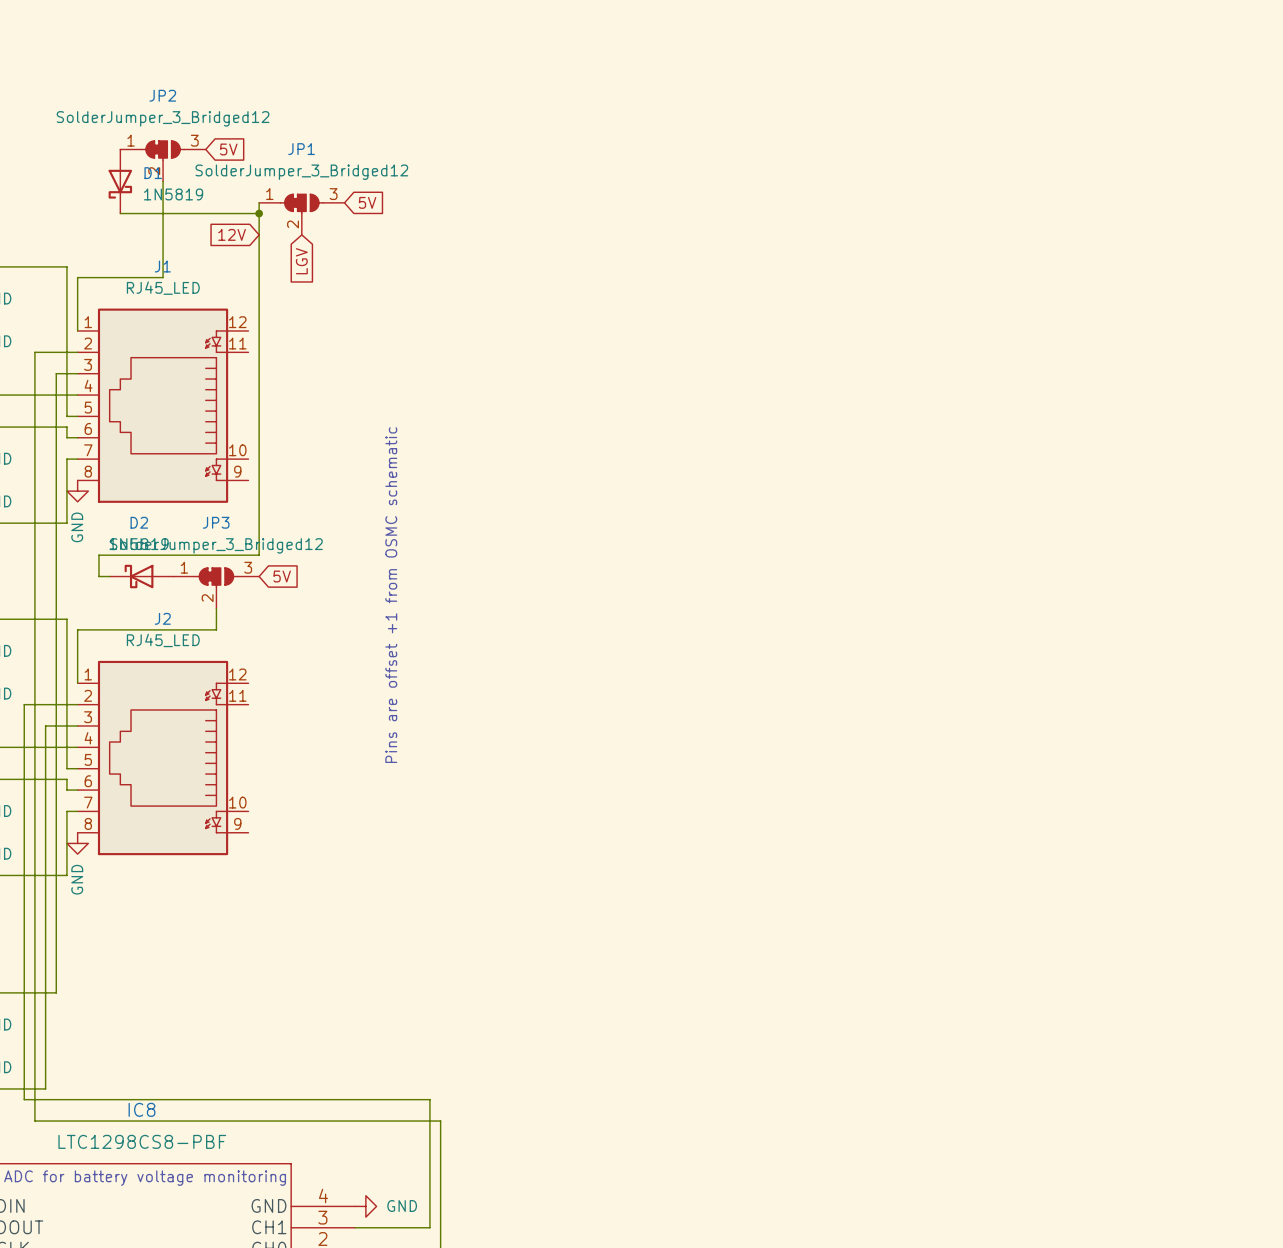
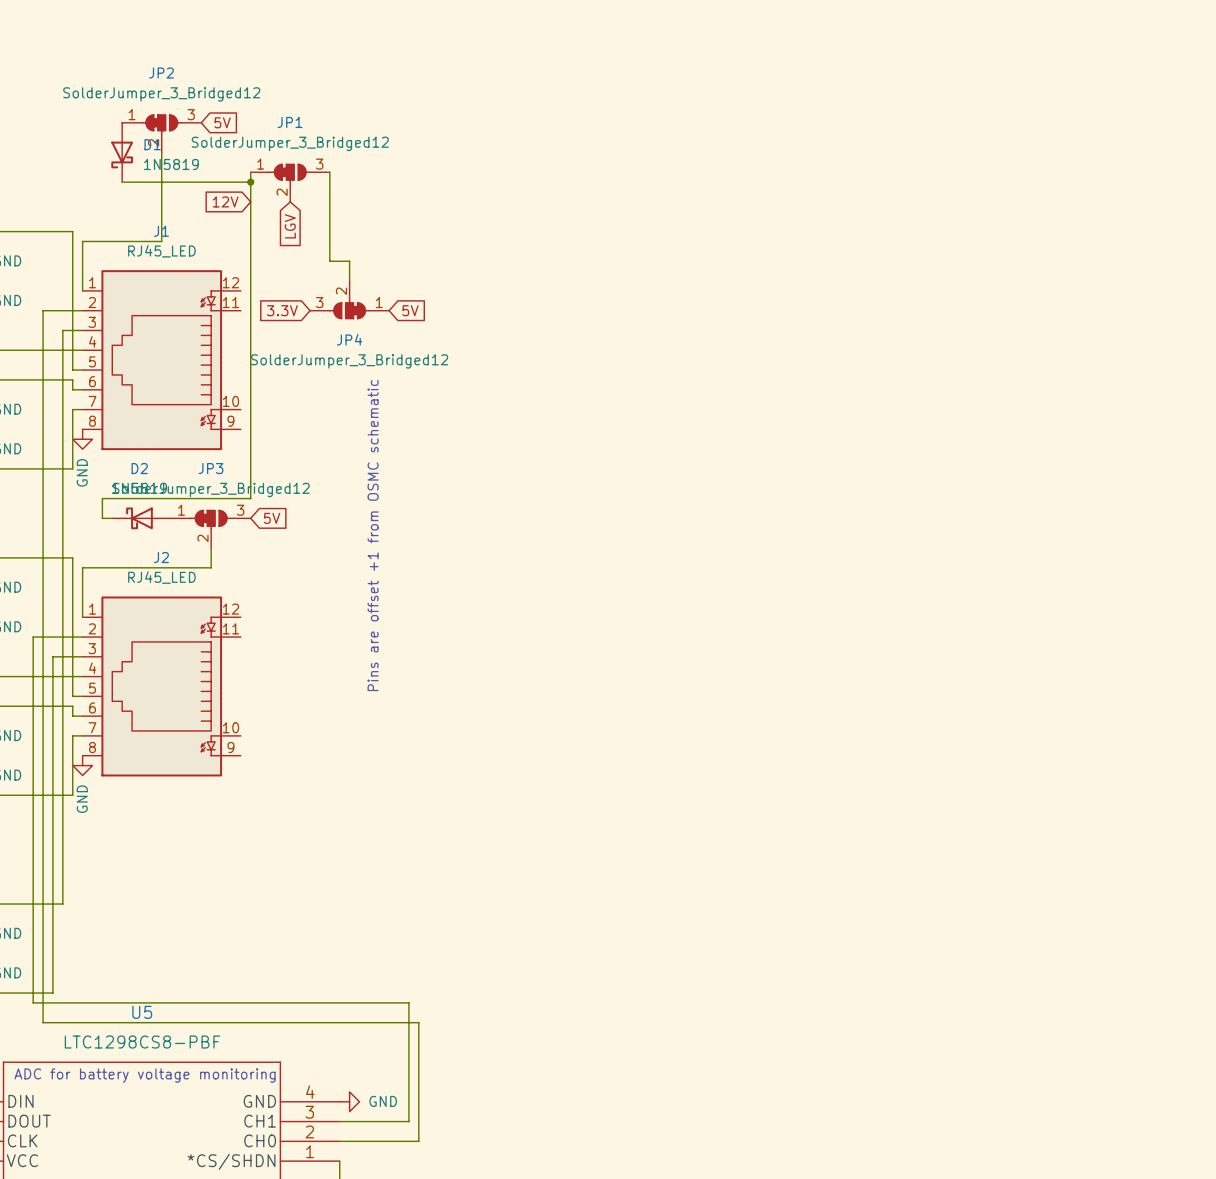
wire: none -> (329, 172) (329, 261) (349, 261) (349, 281)
global label position: 5V (367, 202) -> 5V (410, 310)
JP4: none -> SolderJumper_3_Bridged12 (349, 299)
global label: none -> 3.3V (282, 310)
IC8 name: IC8 (142, 1109) -> U5 (142, 1012)

